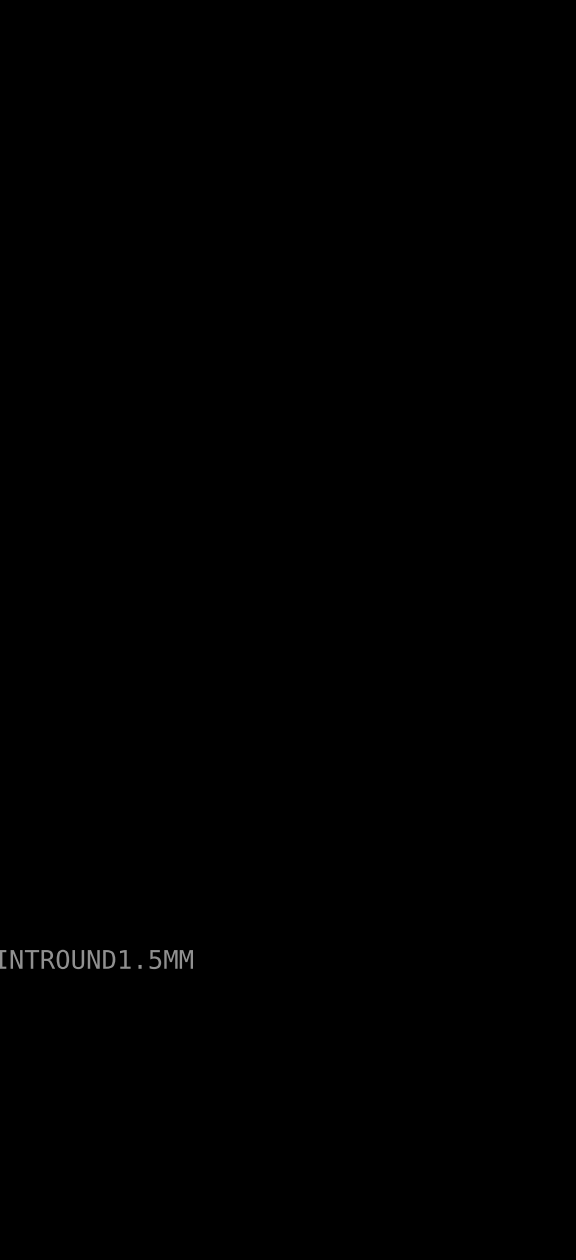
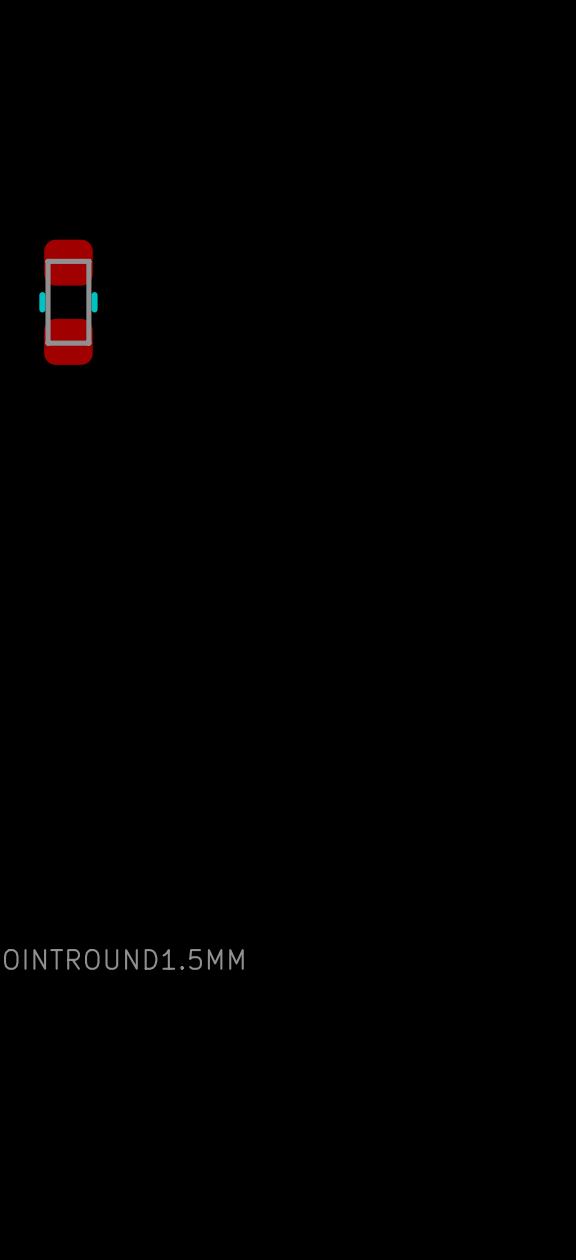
part: none -> (68, 302)

